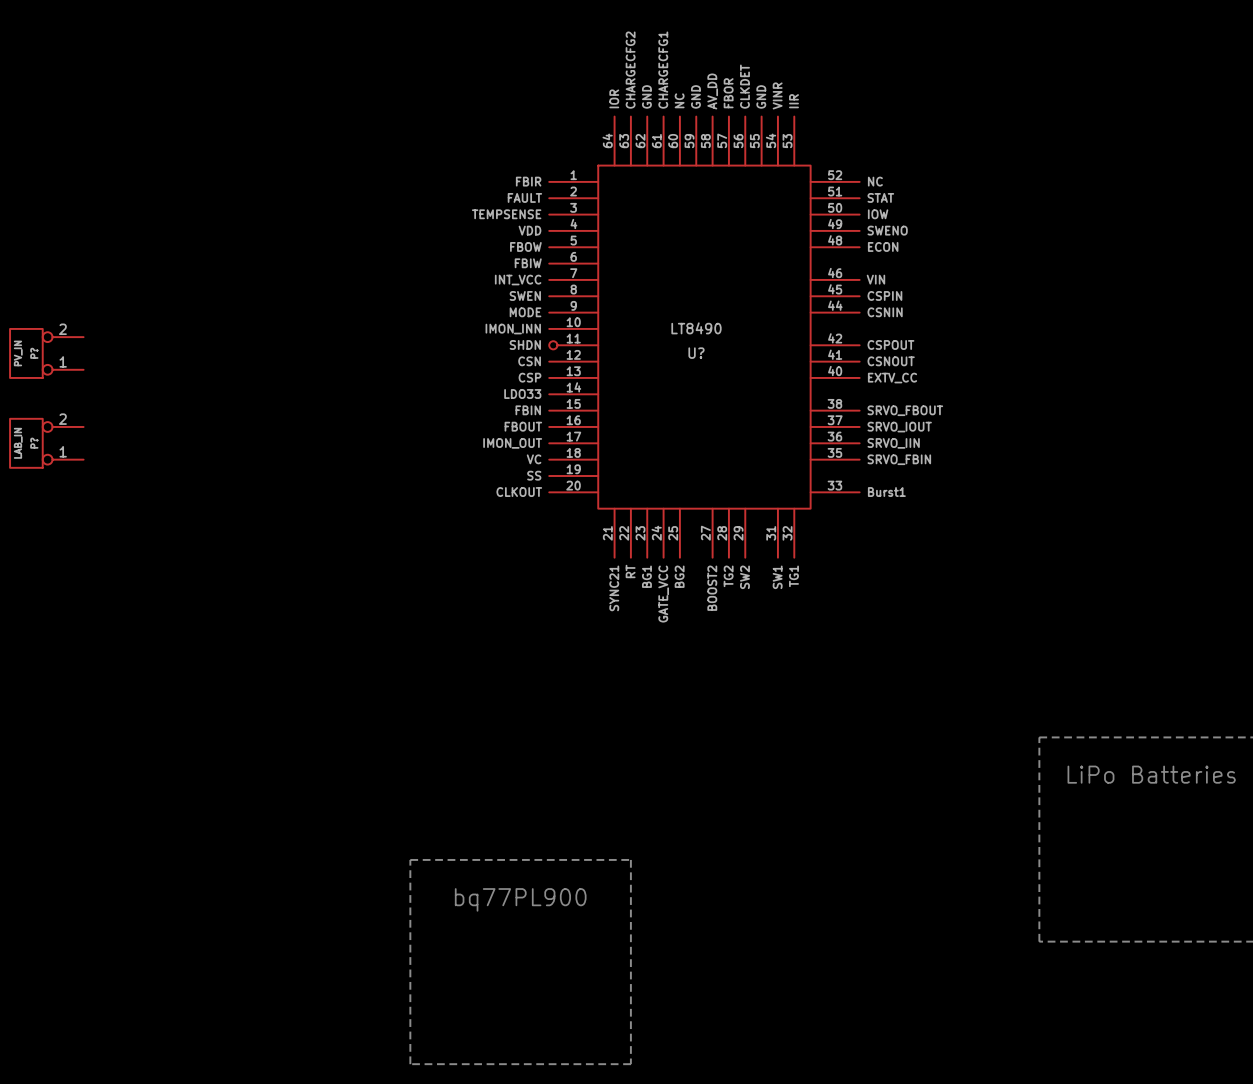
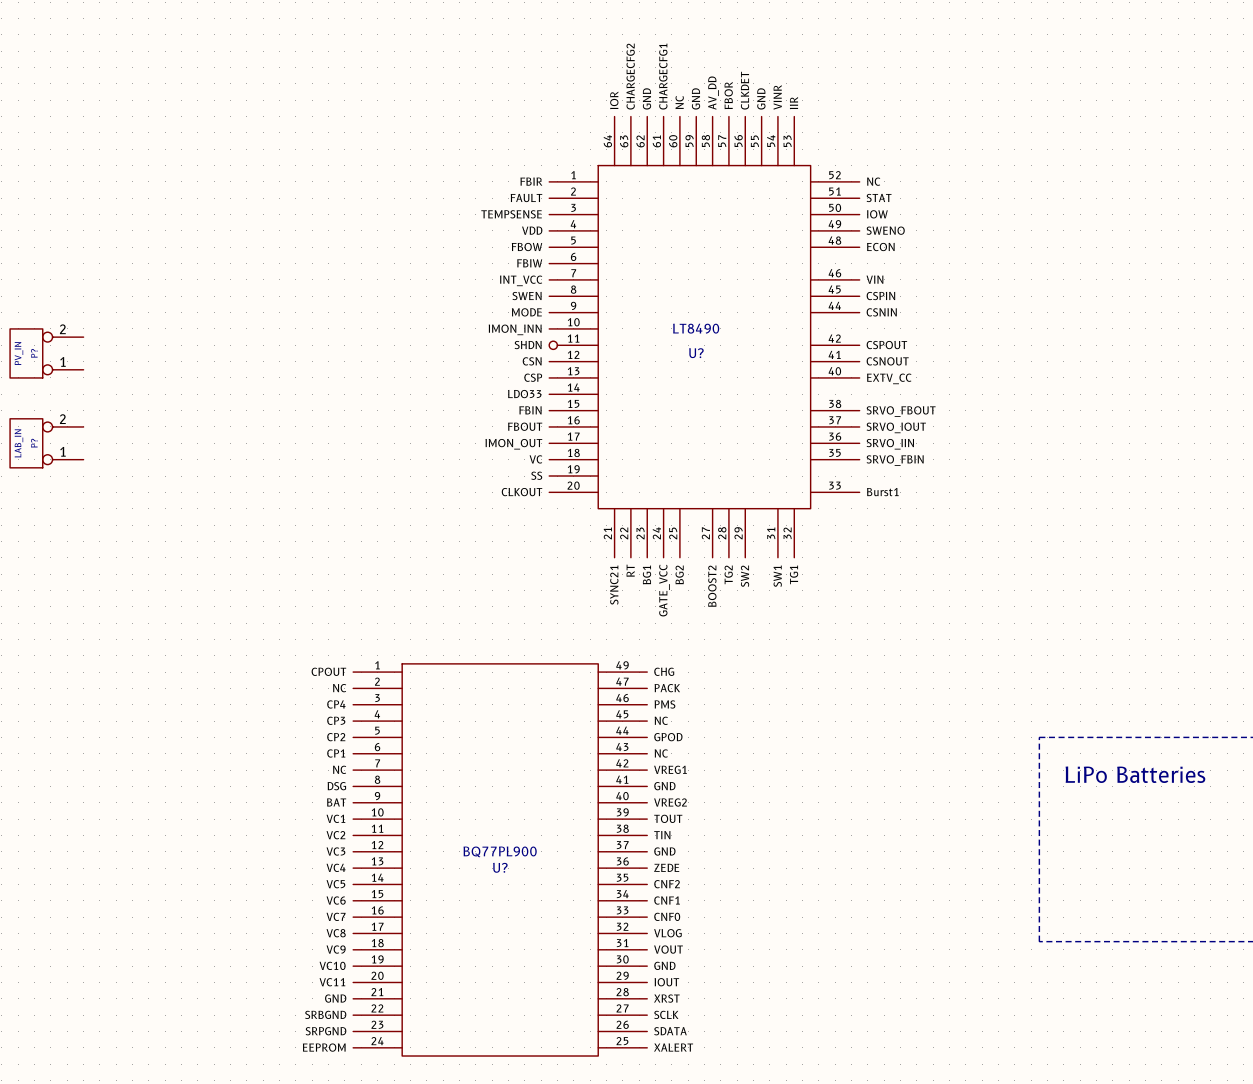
line: (410, 859) (630, 859) (630, 1064) (410, 1064) (410, 859) -> none
U?: none -> BQ77PL900 (500, 859)
text: bq77PL900 (520, 899) -> none

